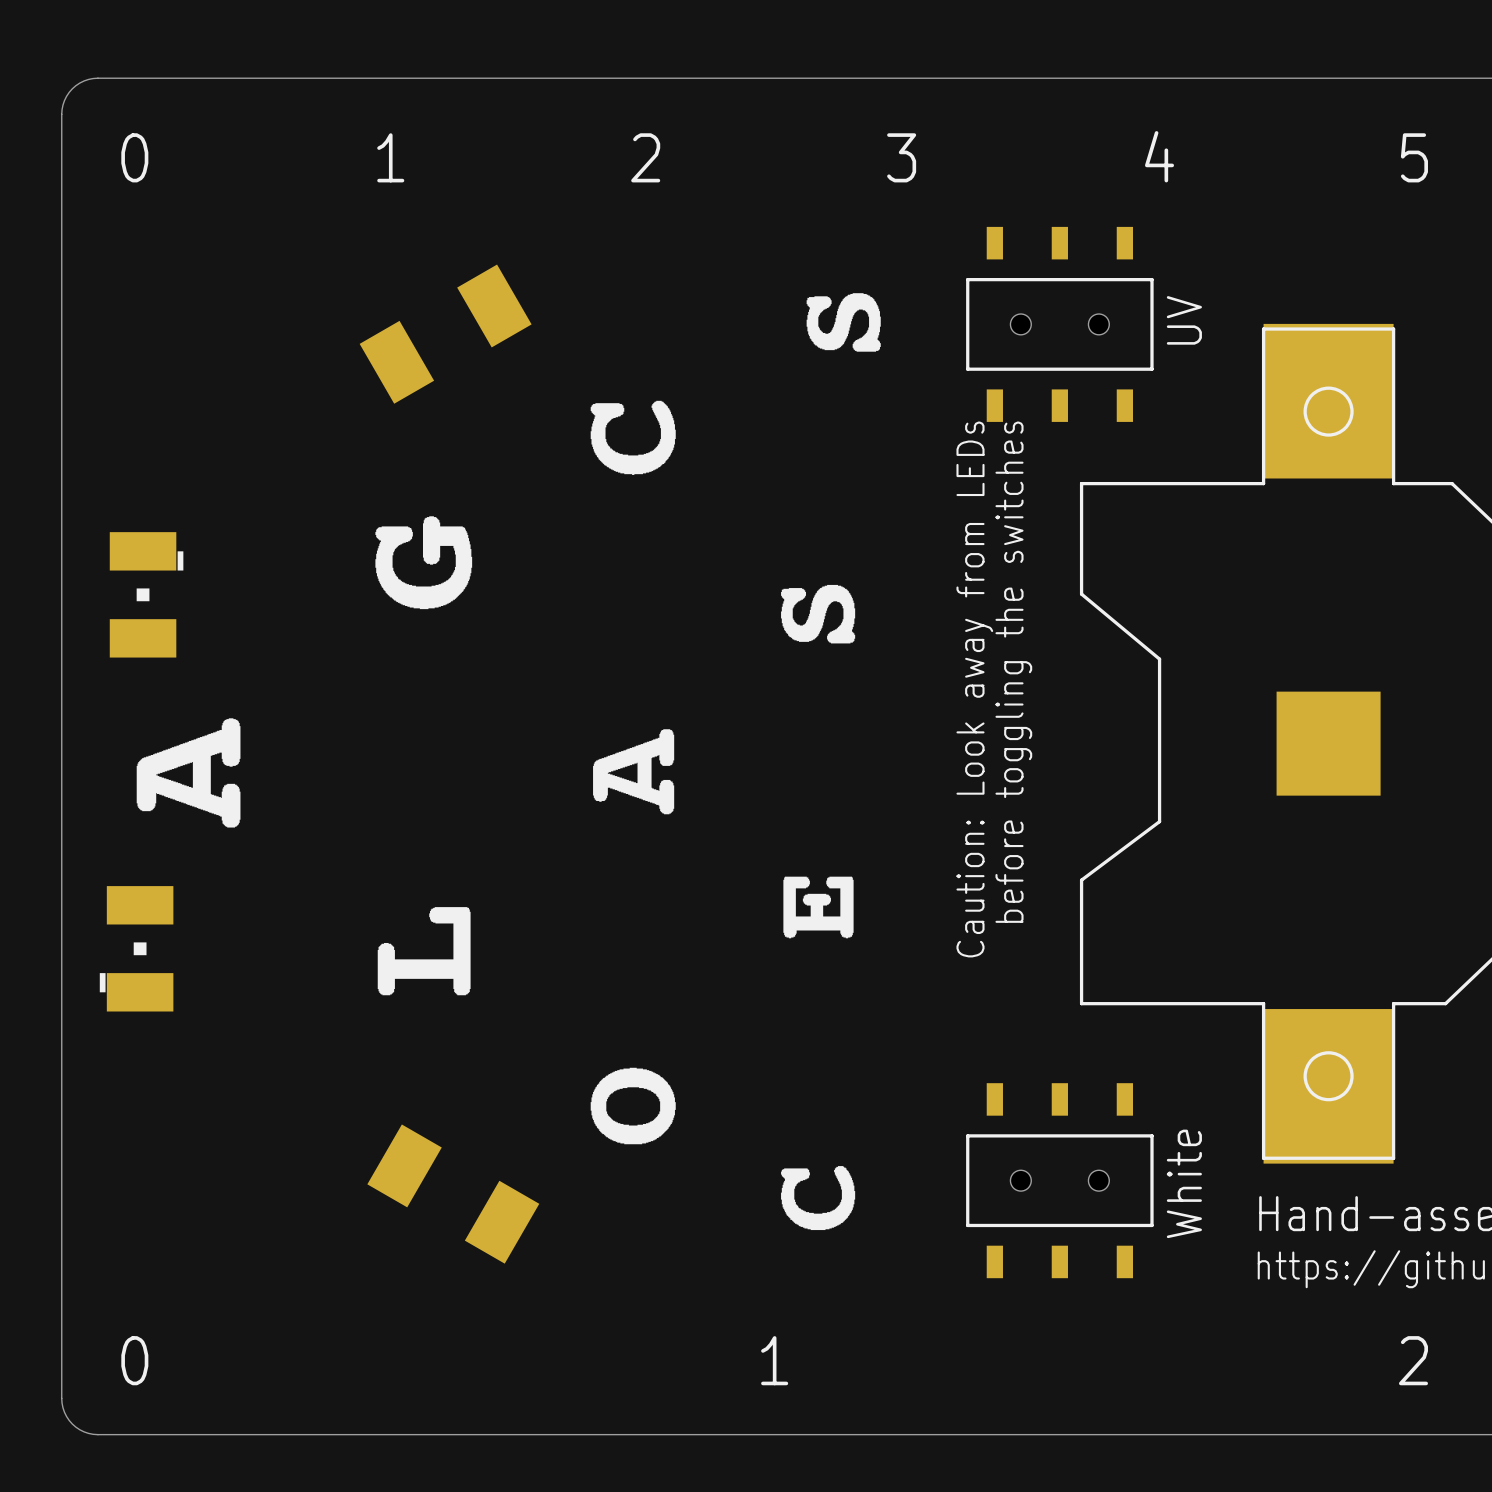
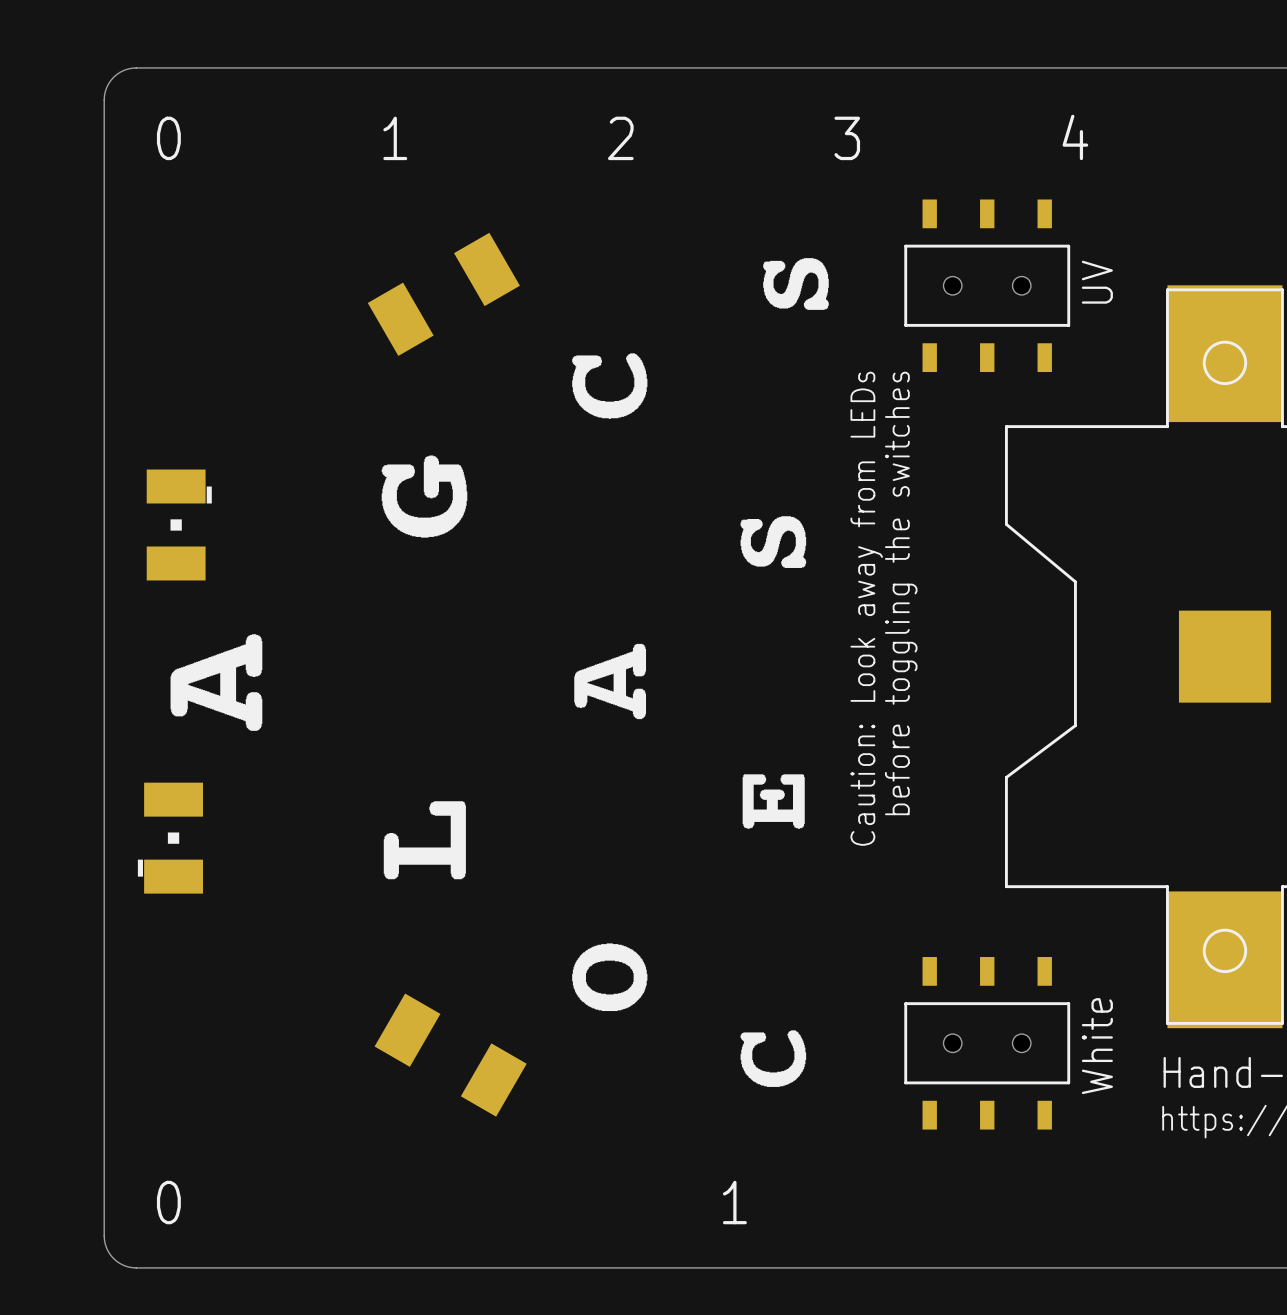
text: before toggling the switches (1013, 672) -> none
text: none -> Caution: Look away from LEDs (866, 608)
text: Caution: Look away from LEDs (974, 689) -> before toggling the switches (901, 593)

